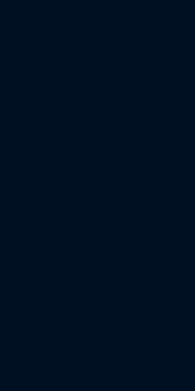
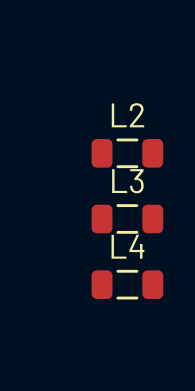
L2: none -> (127, 153)
L3: none -> (127, 218)
L4: none -> (127, 284)

